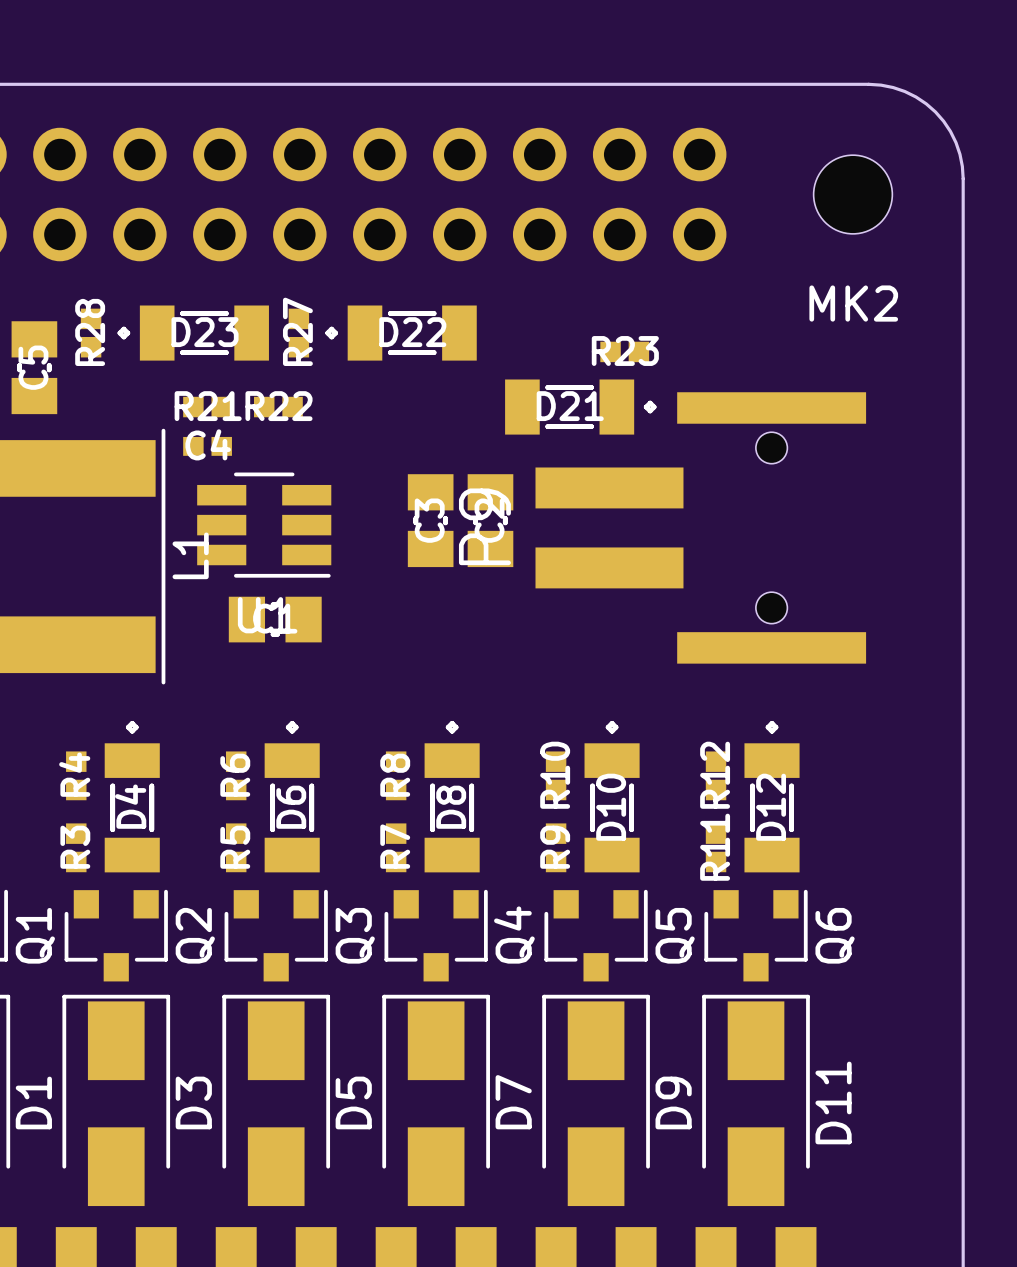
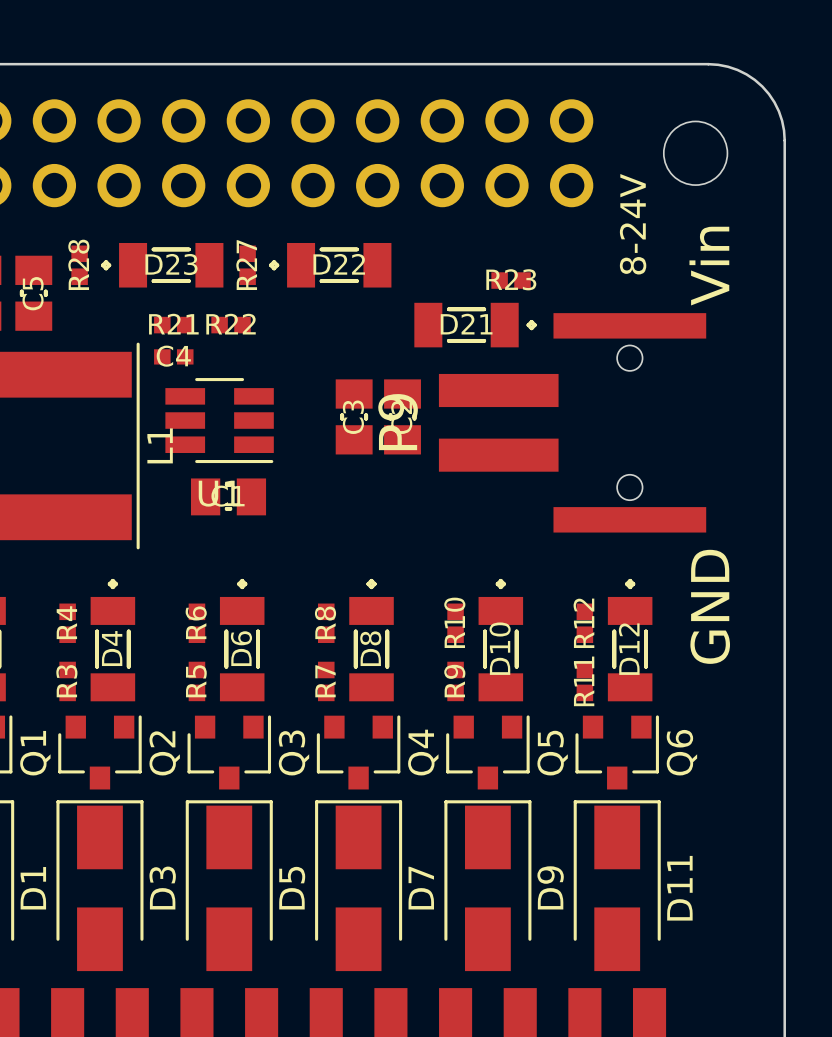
text: none -> 8-24V (633, 224)
MK2 name: MK2 (853, 303) -> none
text: none -> Vin (709, 266)
text: none -> GND (710, 606)

